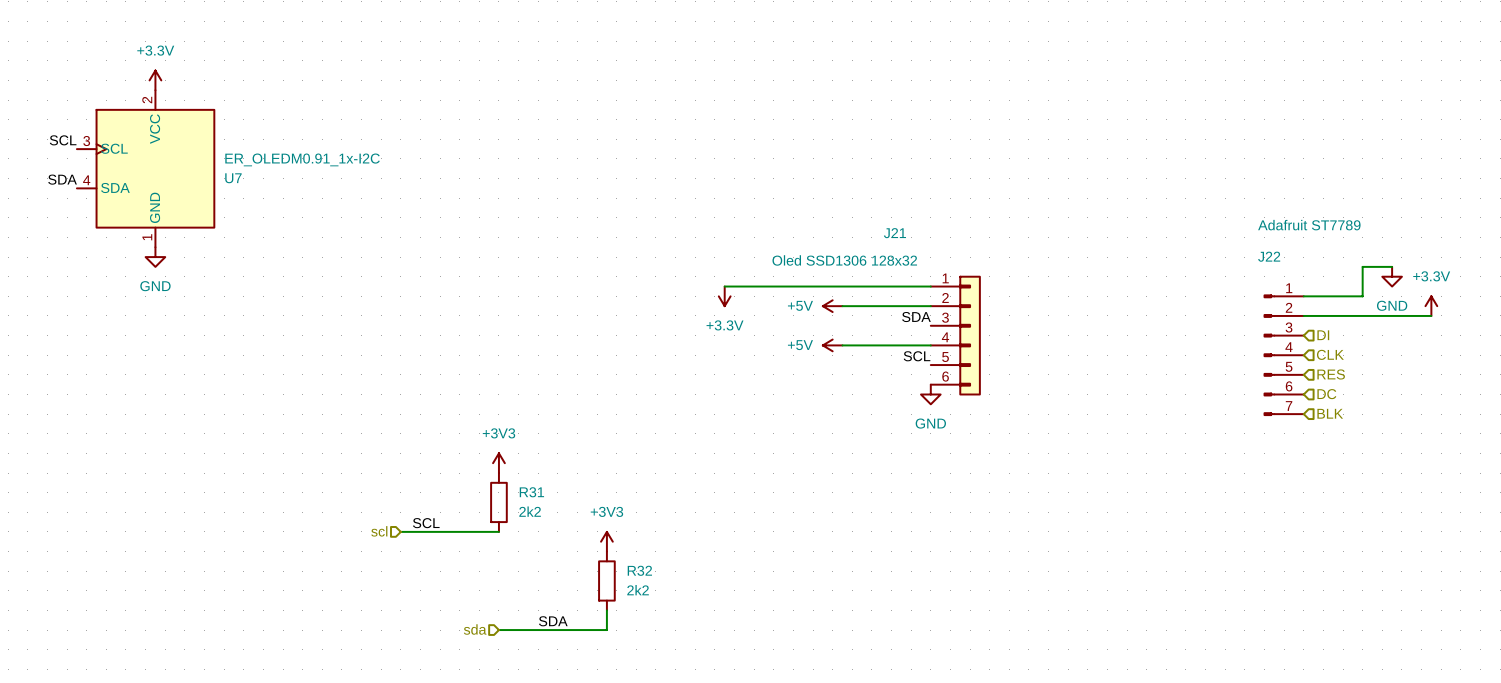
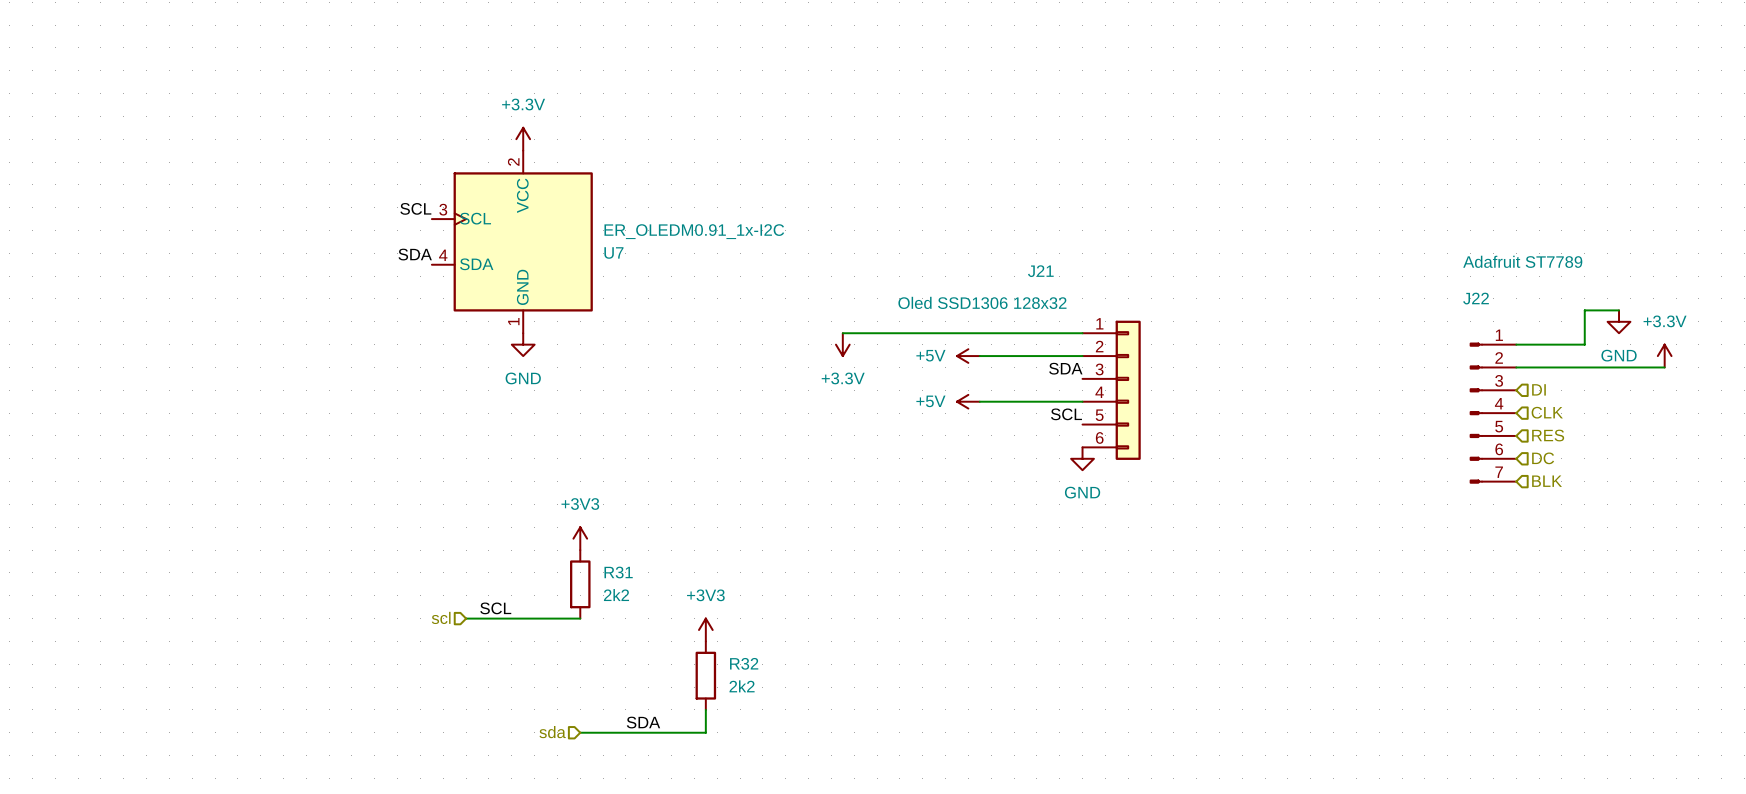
power symbol: +3.3V (155, 80) -> none
power symbol: none -> +3.3V (523, 139)
label: SCL (63, 140) -> none
U7 position: (146, 168) -> (512, 241)
label: SDA (62, 179) -> none
label: none -> SCL (415, 208)
label: none -> SDA (415, 254)
power symbol: GND (155, 257) -> none
power symbol: none -> GND (523, 344)

